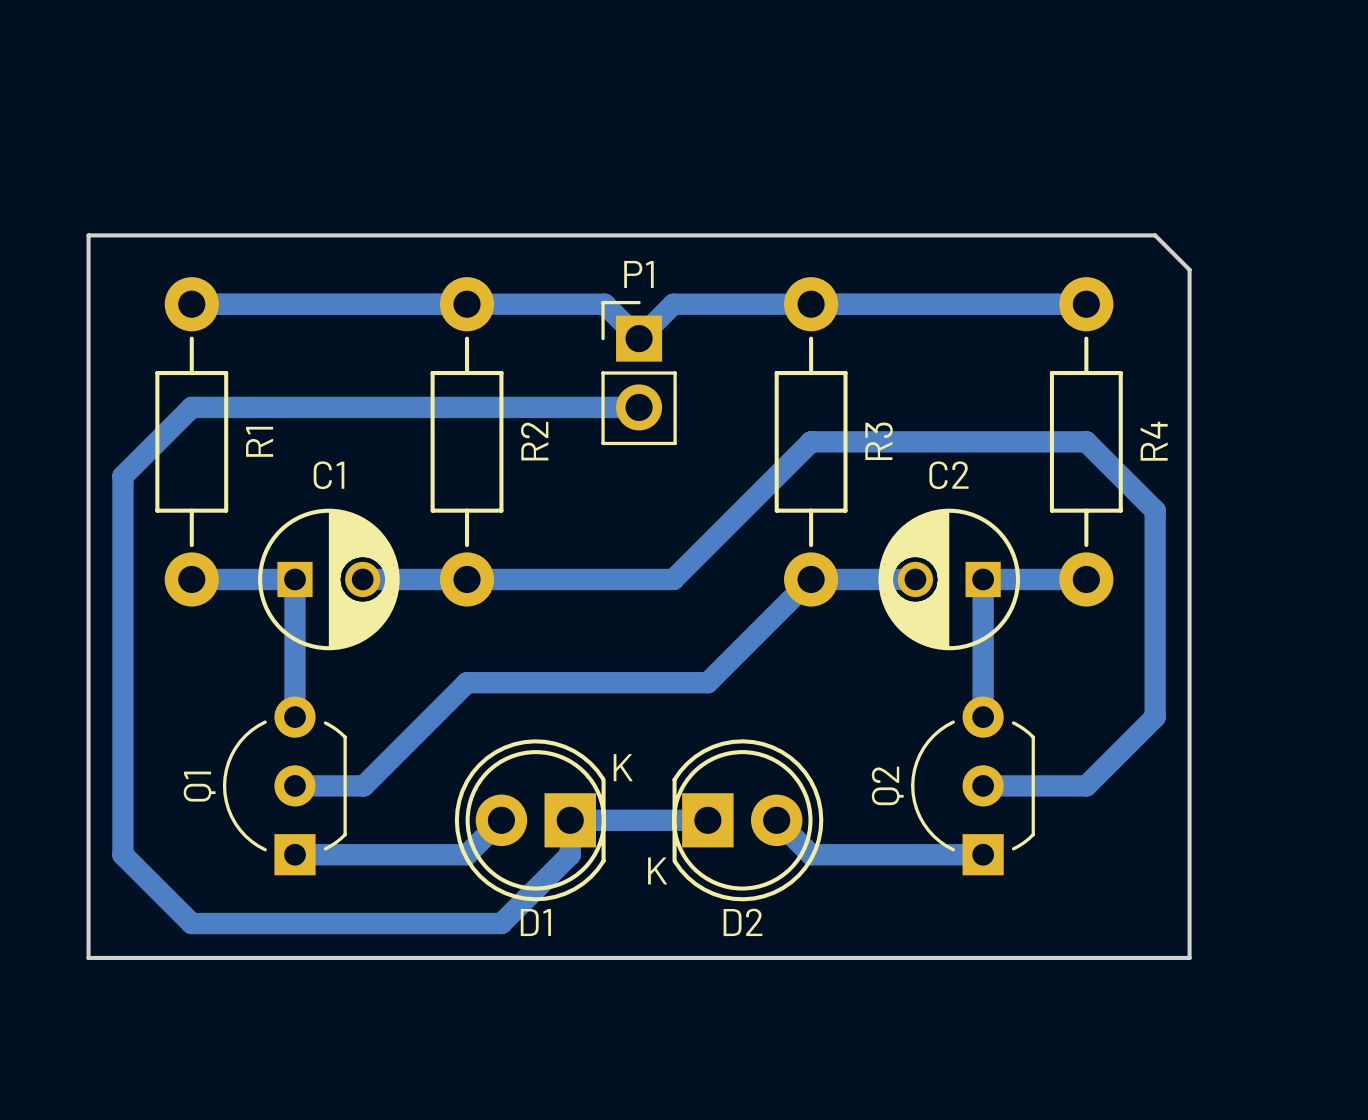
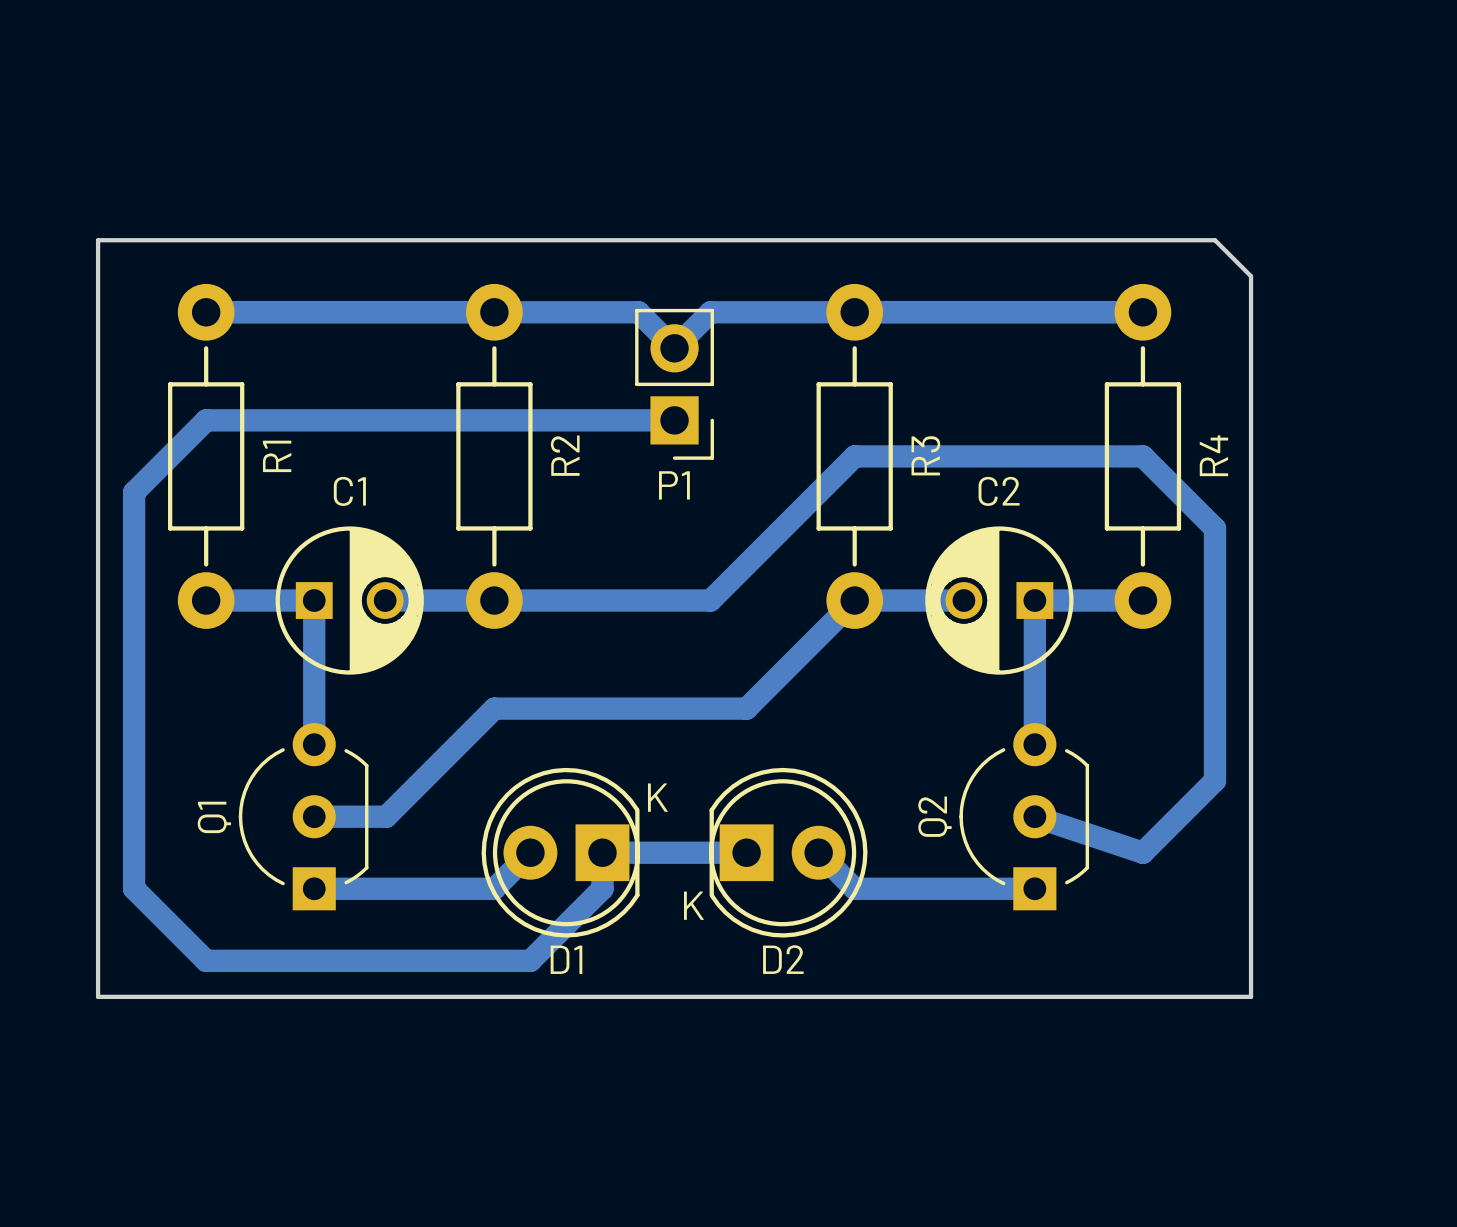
P1 rotation: 0° (639, 373) -> 180° (674, 384)
bottom track: (1155, 717) (1086, 785) (983, 785) -> (1215, 744) (1215, 780) (1142, 852) (1034, 816)

